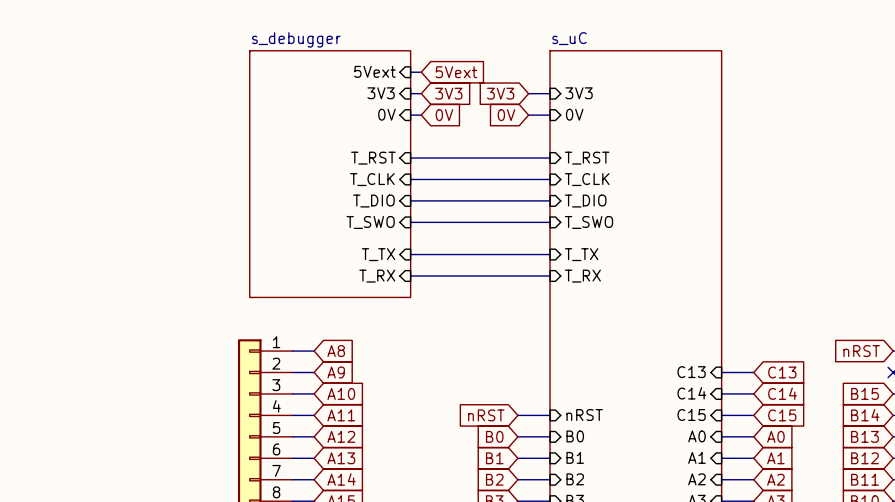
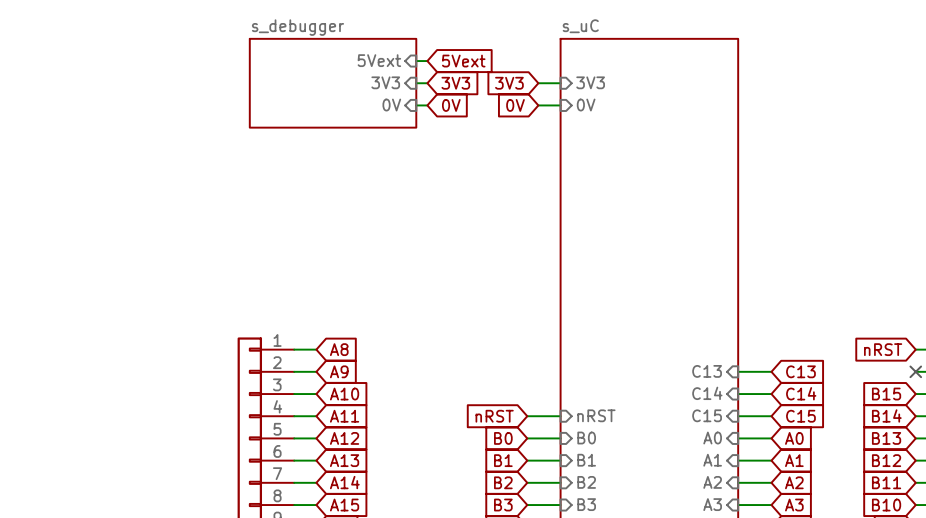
sheet s_debugger: none -> (333, 83)
sheet pin: T_RST (373, 158) -> none
wire: (410, 158) (550, 158) -> none
sheet pin: T_RST (587, 158) -> none
sheet s_debugger: (330, 174) -> none
sheet pin: T_CLK (372, 179) -> none
wire: (410, 179) (550, 179) -> none
sheet pin: T_CLK (587, 179) -> none
wire: (410, 200) (550, 200) -> none
sheet pin: T_DIO (373, 201) -> none
sheet pin: T_DIO (585, 201) -> none
sheet pin: T_SWO (370, 222) -> none
wire: (410, 222) (550, 222) -> none
sheet pin: T_SWO (589, 222) -> none
sheet pin: T_TX (378, 254) -> none
wire: (410, 254) (550, 254) -> none
sheet pin: T_TX (581, 254) -> none
wire: (410, 275) (550, 275) -> none
sheet pin: T_RX (377, 276) -> none
sheet pin: T_RX (582, 276) -> none

